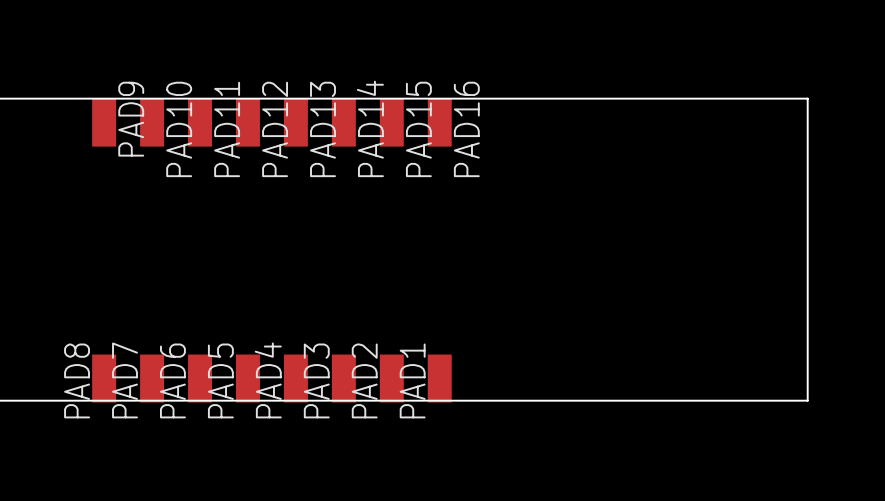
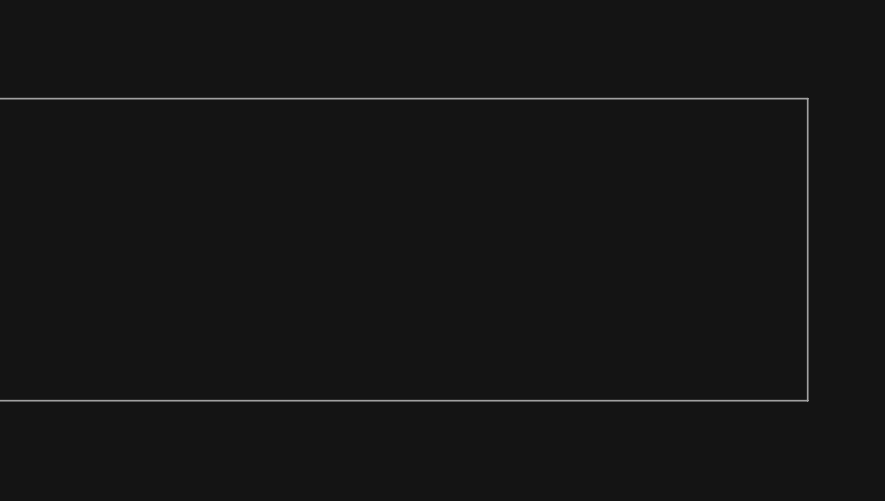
PAD9: (104, 122) -> none
PAD10: (152, 122) -> none
PAD11: (200, 122) -> none
PAD12: (247, 122) -> none
PAD13: (295, 122) -> none
PAD14: (343, 122) -> none
PAD15: (391, 122) -> none
PAD16: (439, 122) -> none
PAD8: (104, 378) -> none
PAD7: (152, 378) -> none
PAD6: (200, 378) -> none
PAD5: (247, 378) -> none
PAD4: (295, 378) -> none
PAD3: (343, 378) -> none
PAD2: (391, 378) -> none
PAD1: (439, 378) -> none

